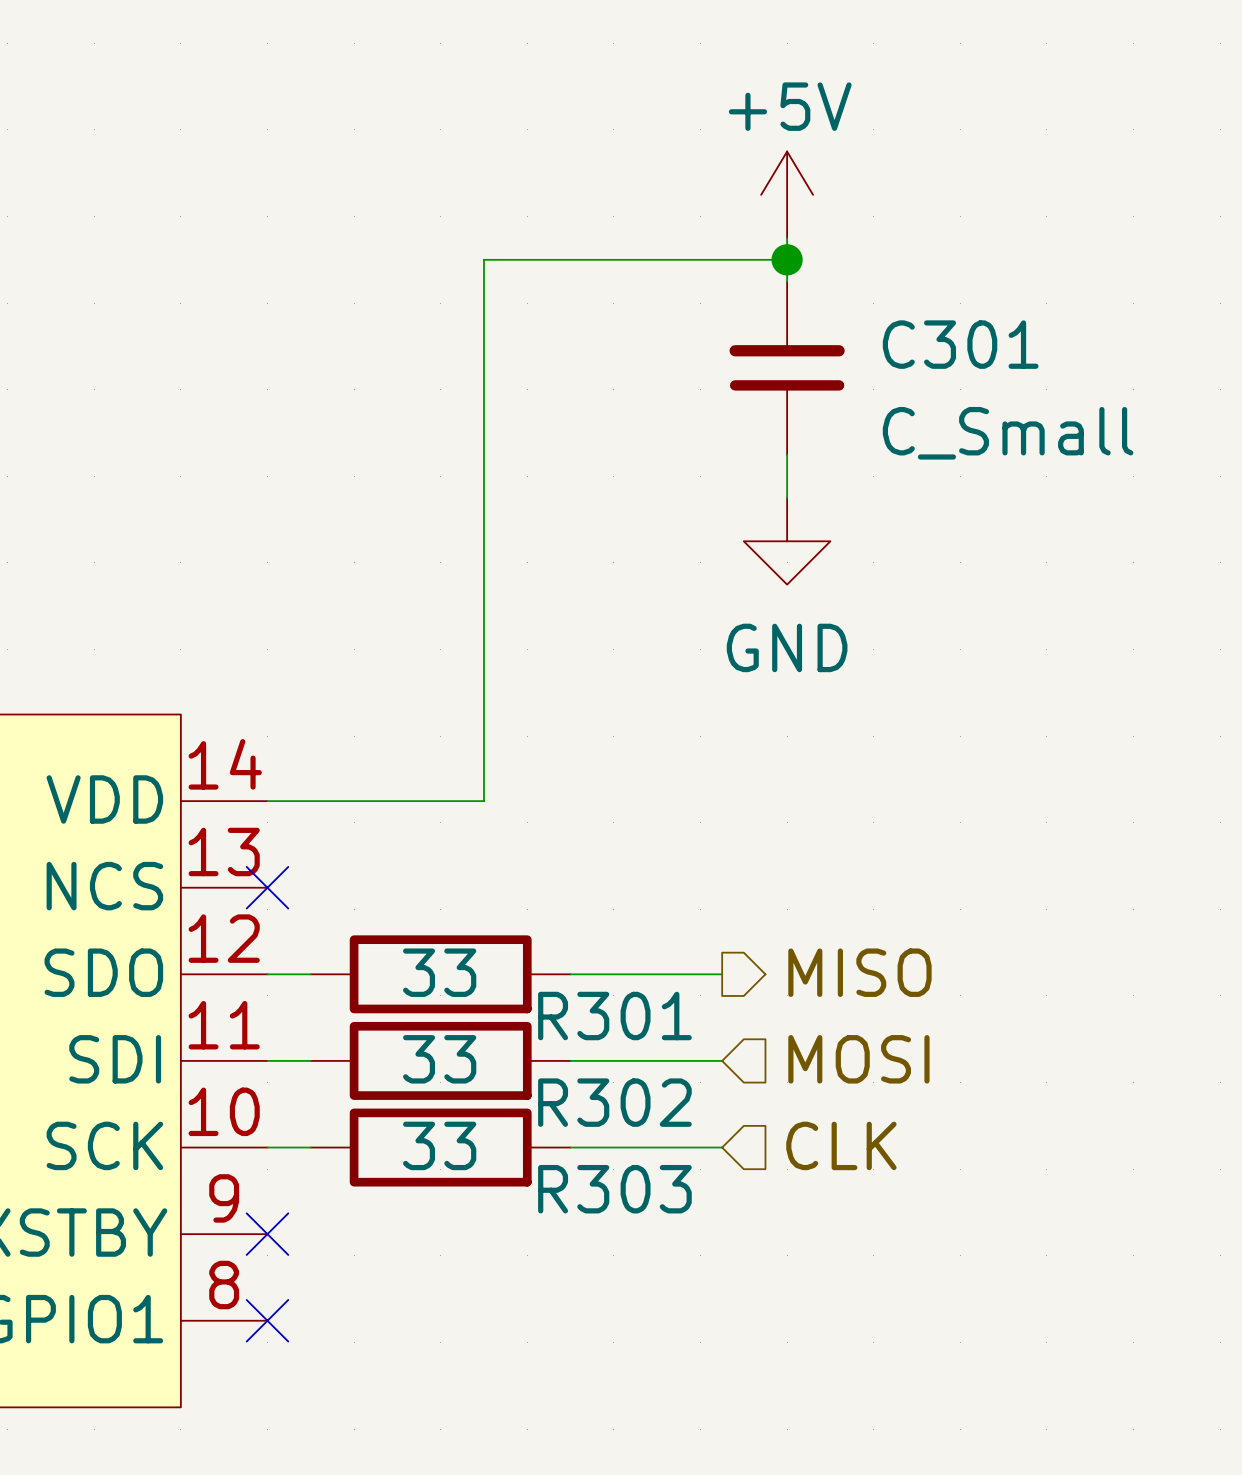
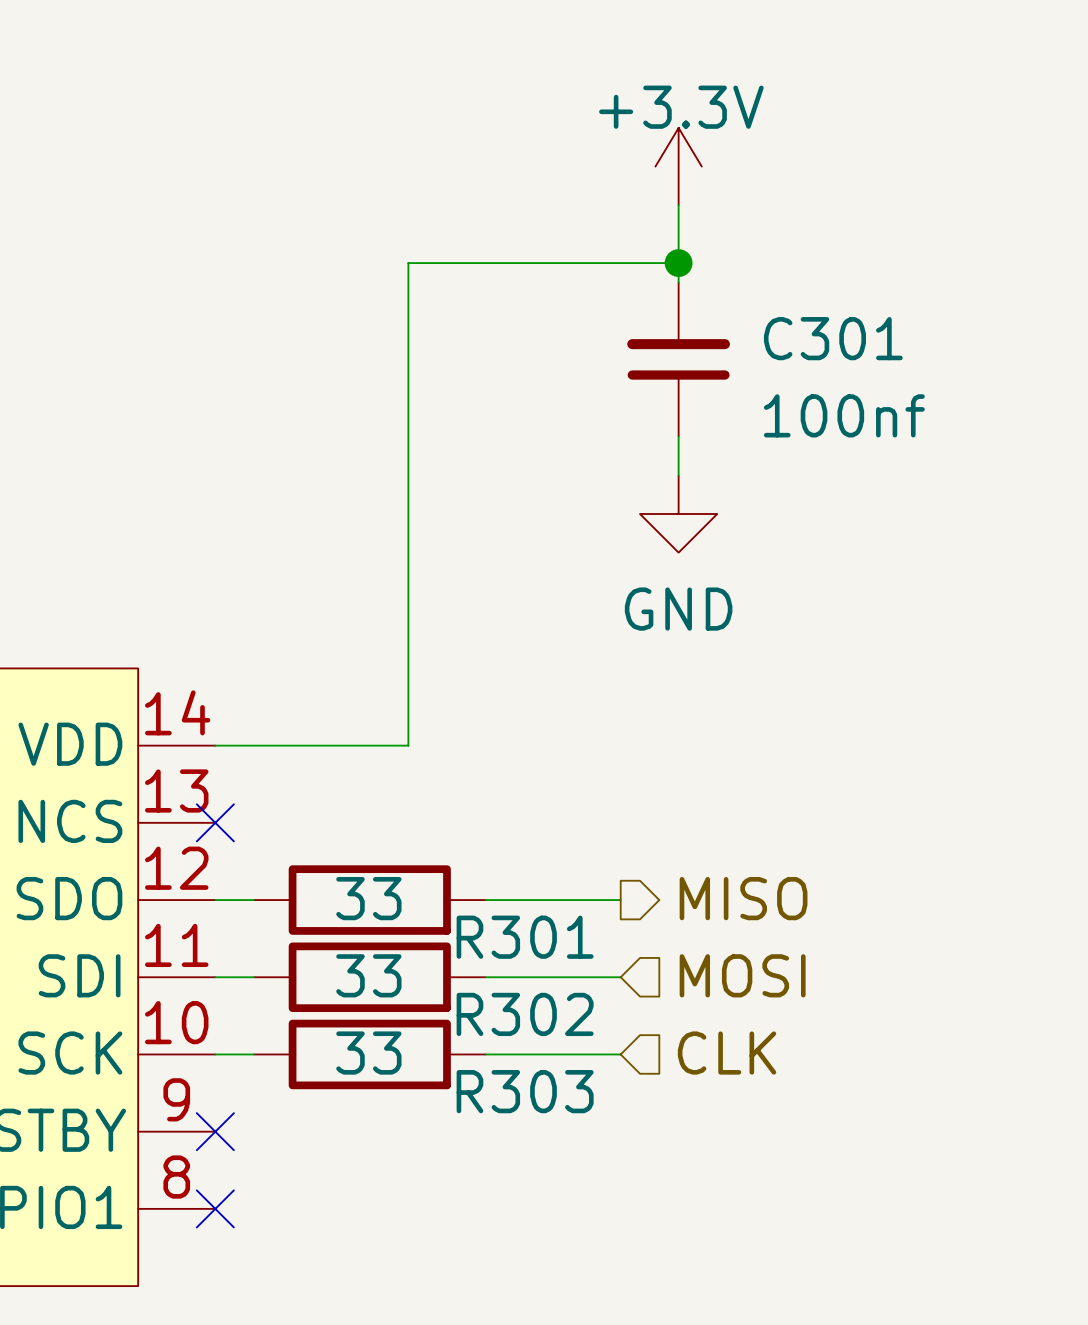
power symbol: none -> +3.3V (678, 166)
power symbol: +5V (787, 194) -> none
C301 value: C_Small (1008, 433) -> 100nf (844, 415)

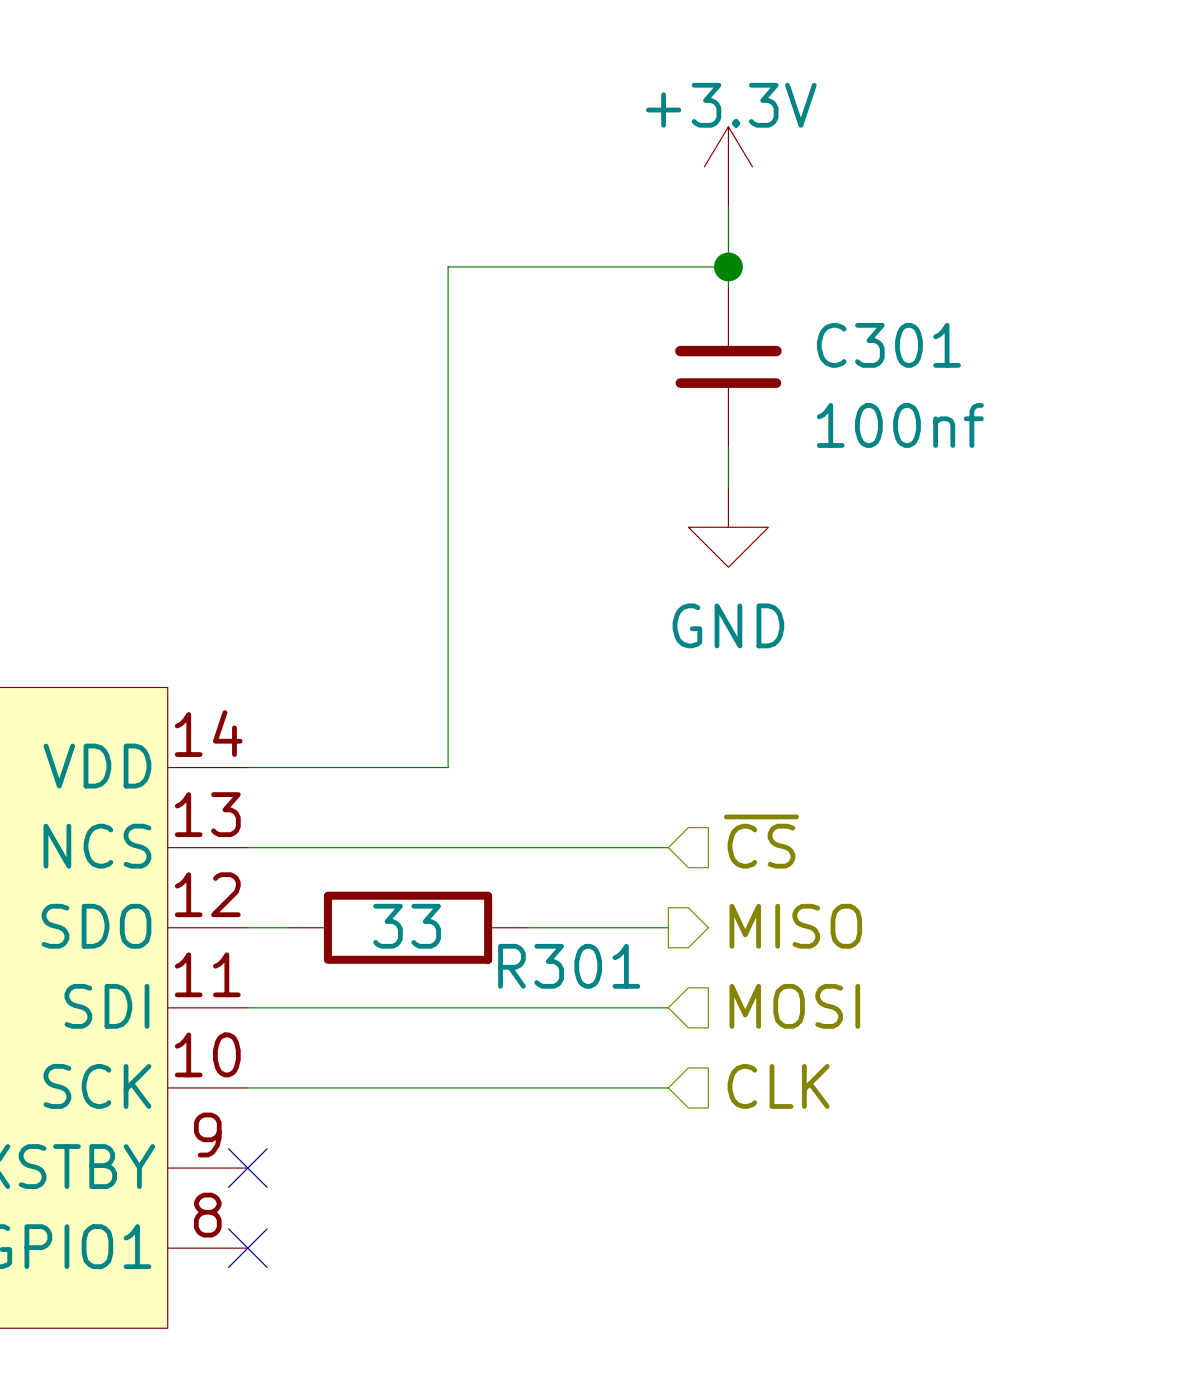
hierarchical label: none -> ~{CS} (761, 841)
wire: none -> (247, 847) (668, 847)
no-connect mark: (215, 822) -> none
wire: none -> (287, 1007) (528, 1007)
R302: 33 (369, 977) -> none
wire: none -> (287, 1087) (528, 1087)
R303: 33 (369, 1054) -> none

